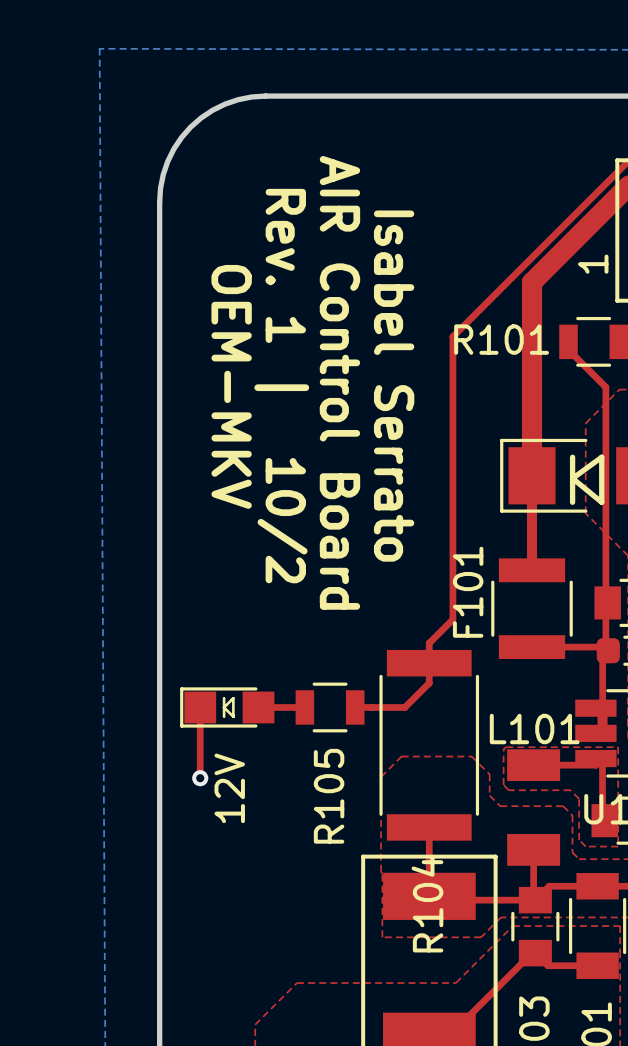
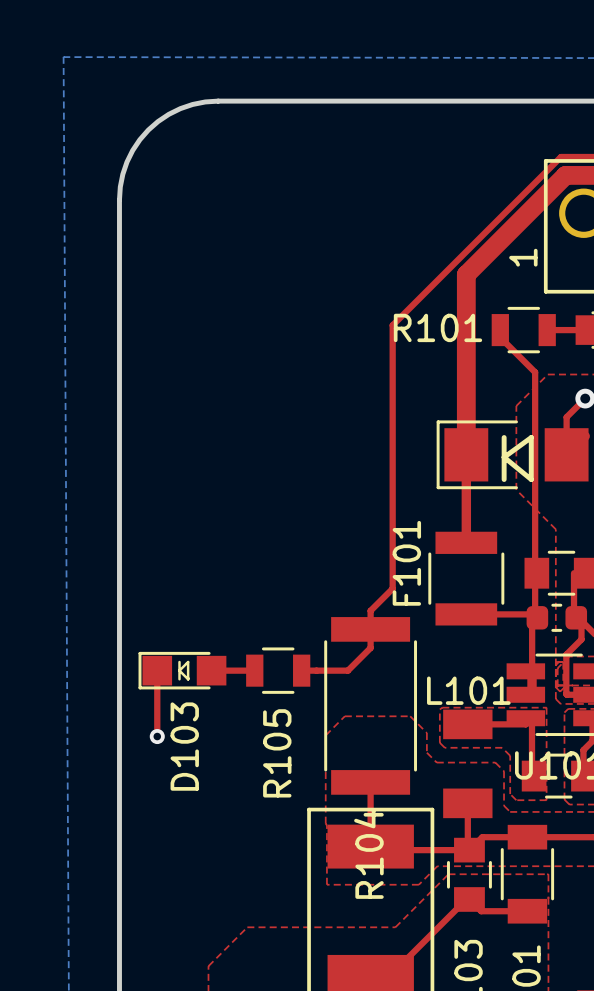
text: AIR Control Board (339, 382) -> none
text: OEM-MKV (231, 386) -> none
text: Rev. 1 | 10/2 (281, 386) -> none
text: Isabel Serrato (394, 386) -> none
12V name: 12V (229, 788) -> D103 (184, 746)

